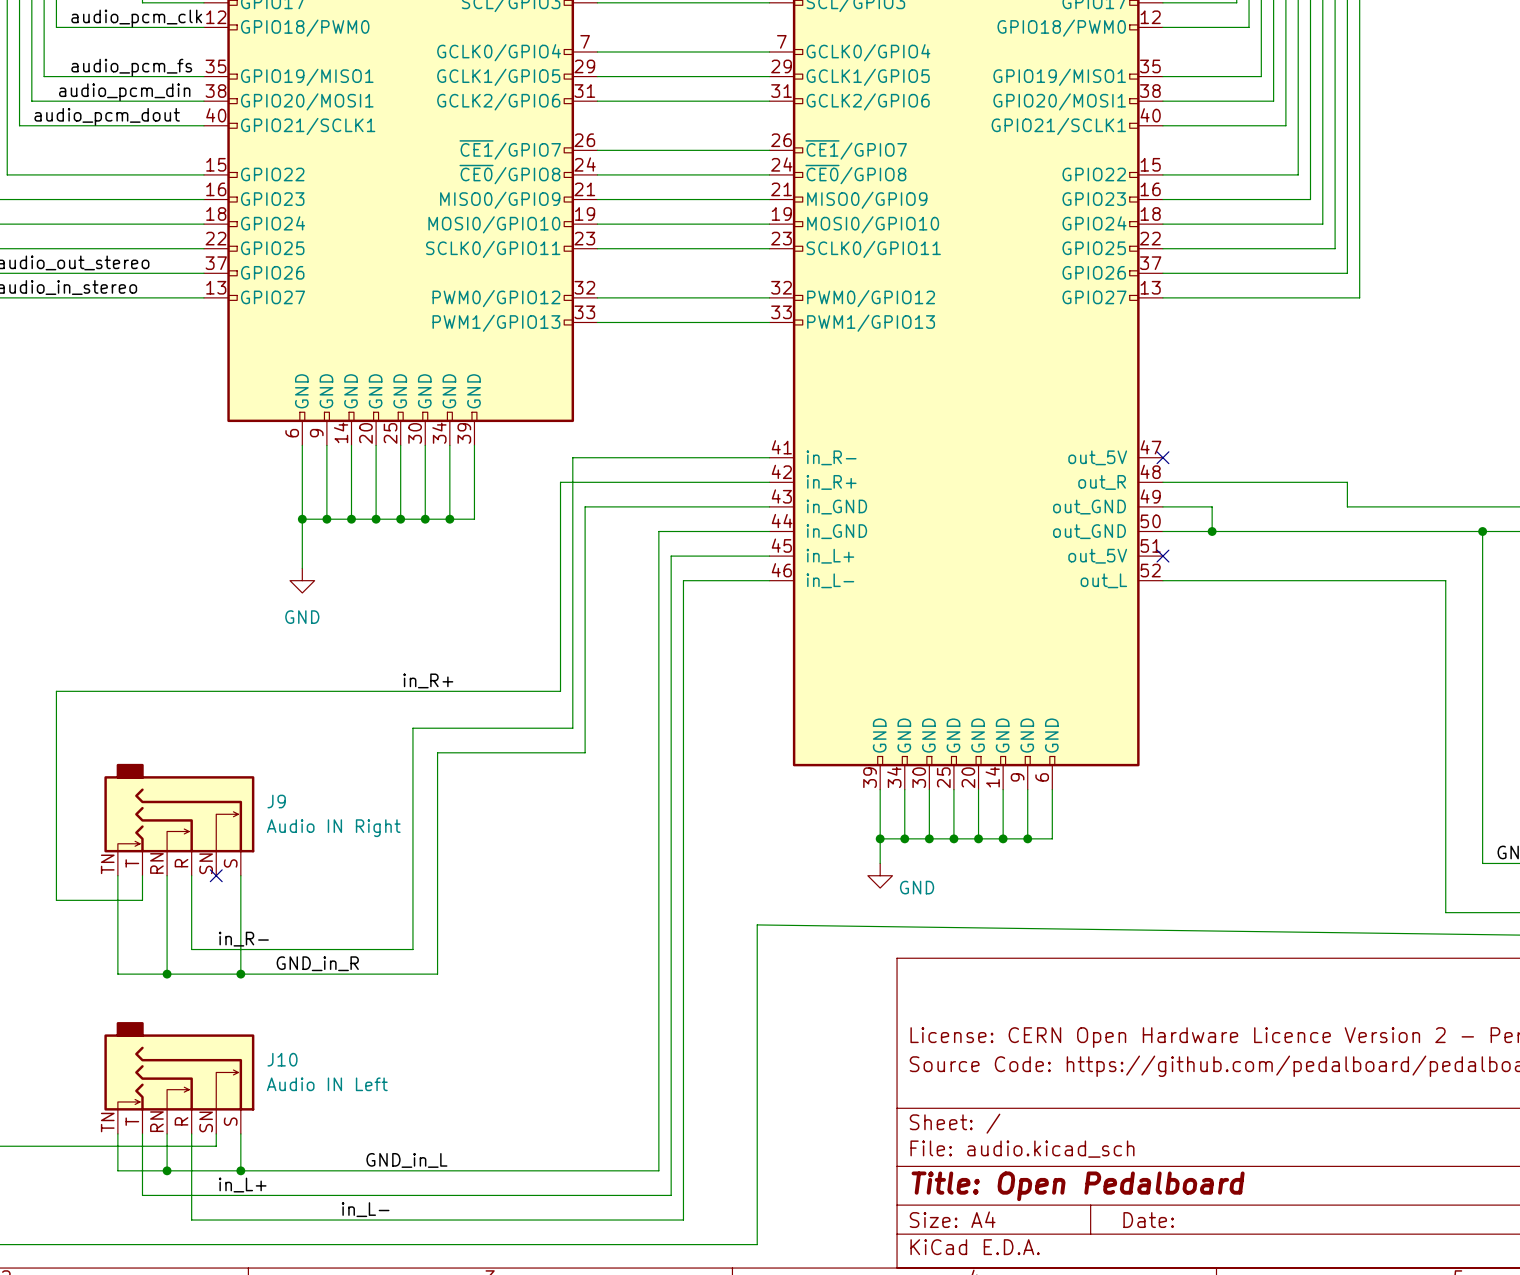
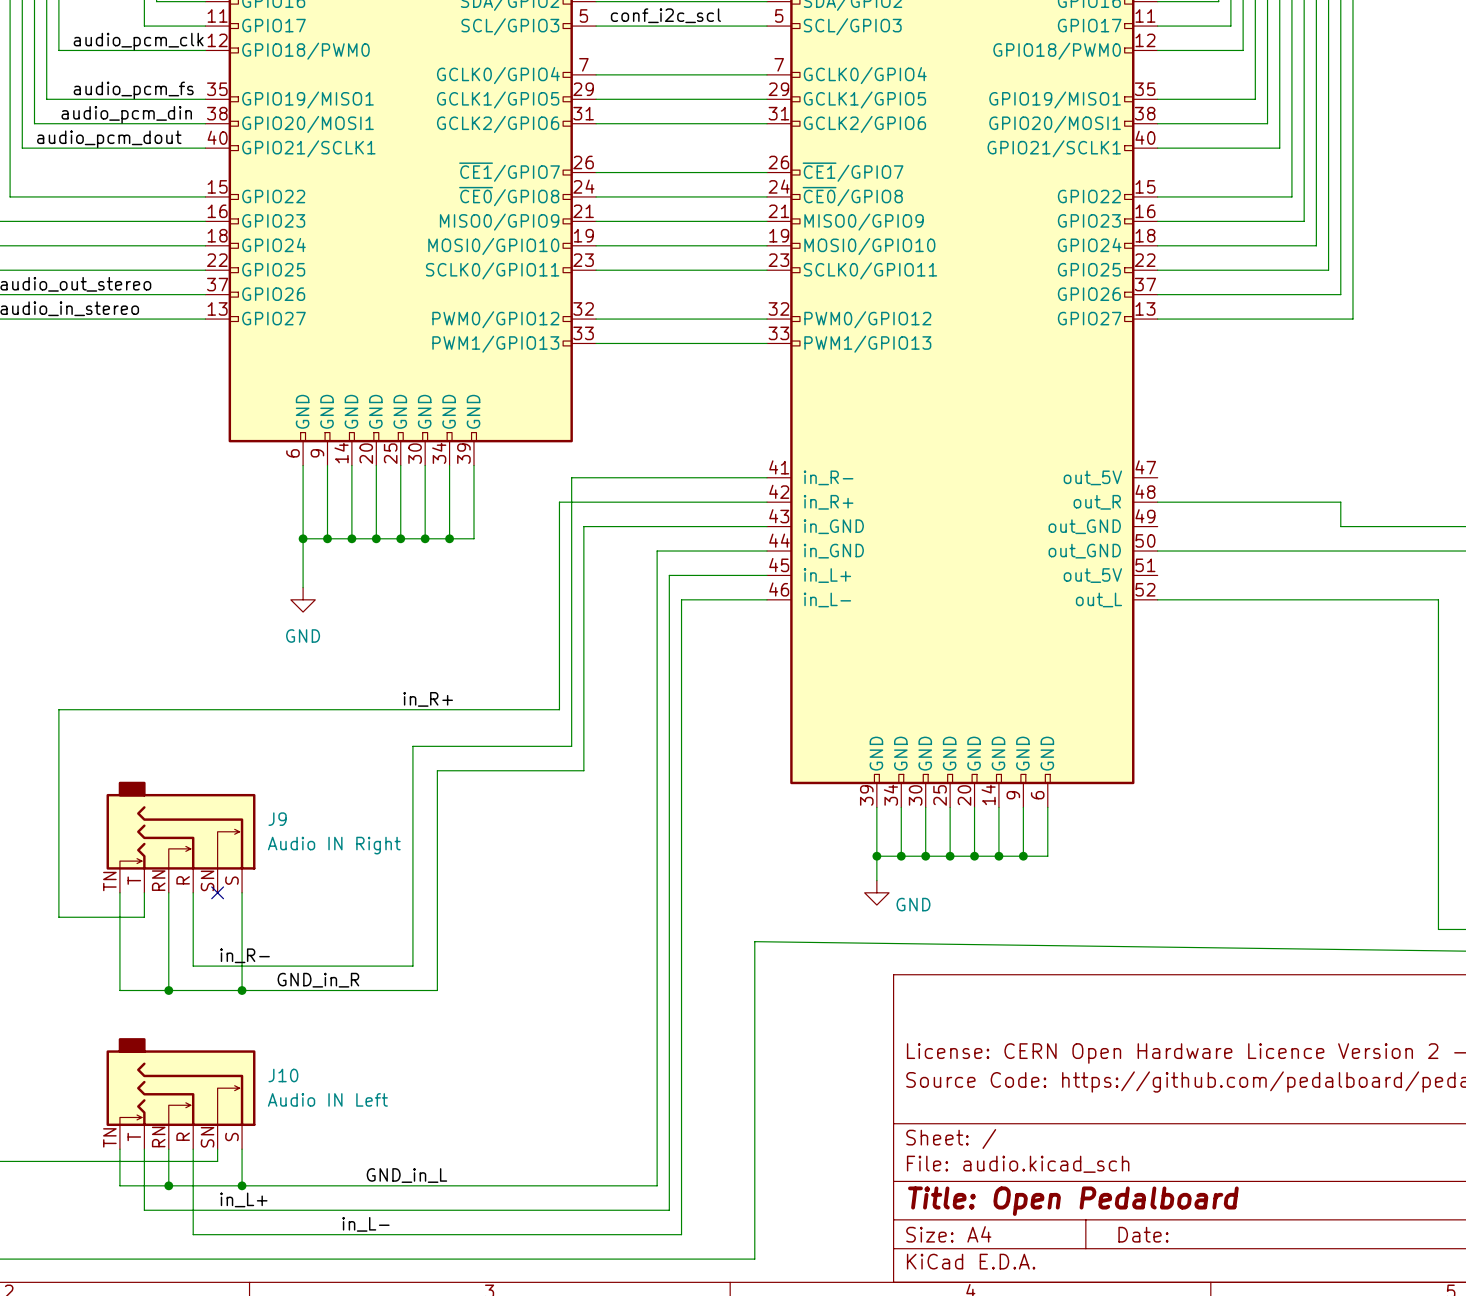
no-connect mark: (1162, 457) -> none
wire: (1162, 506) (1212, 506) (1212, 531) -> none
junction: (1212, 531) -> none
no-connect mark: (1162, 556) -> none

